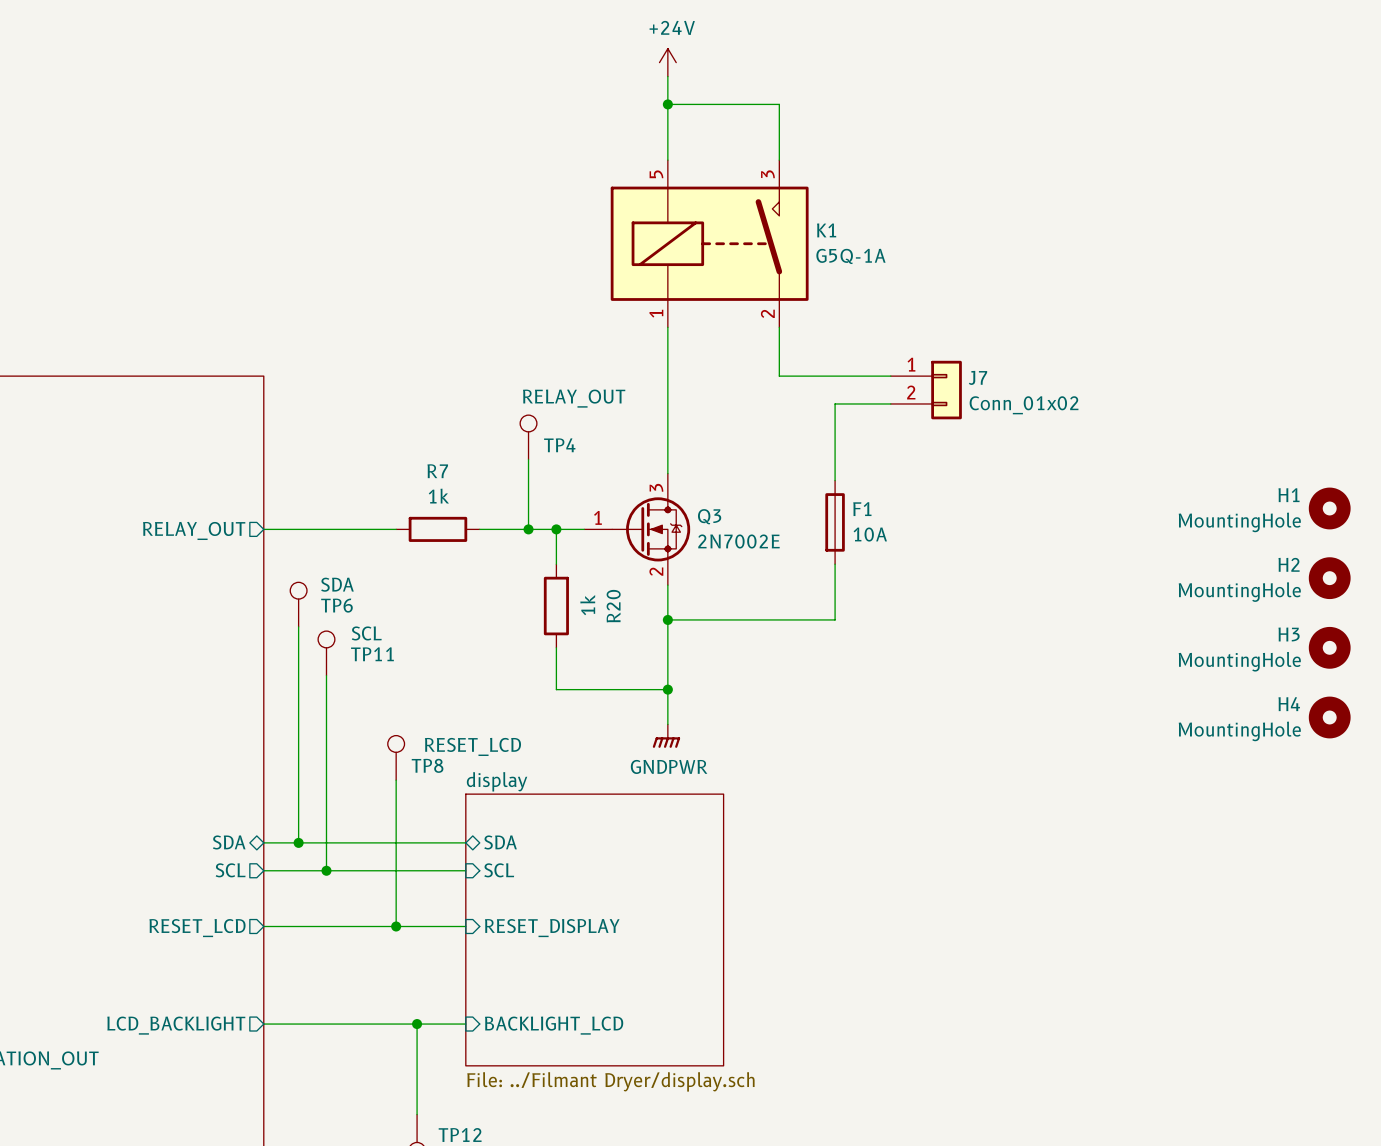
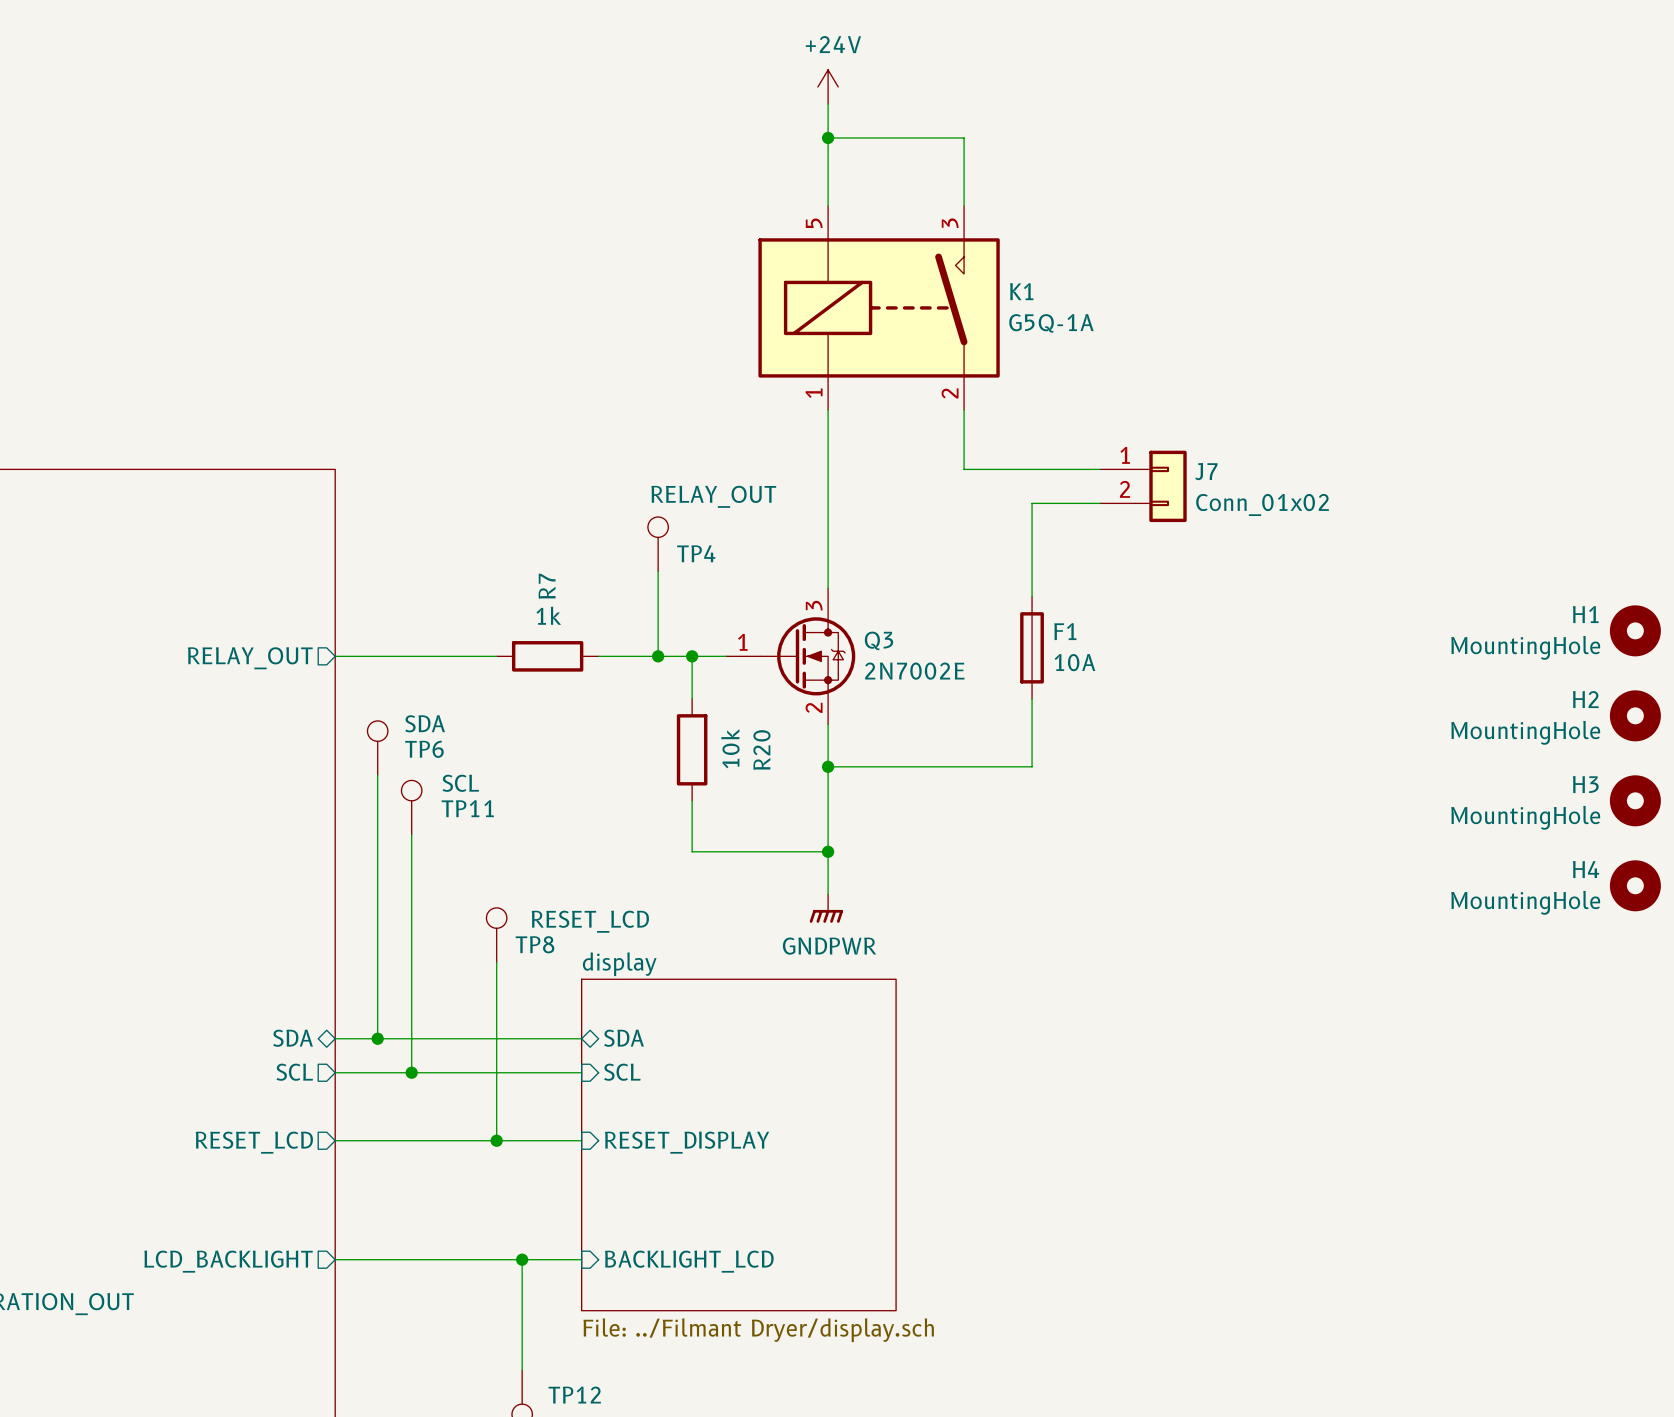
R7 name rotation: 0° (437, 471) -> 90° counterclockwise (547, 586)
R20 value: 1k (587, 605) -> 10k (730, 748)

